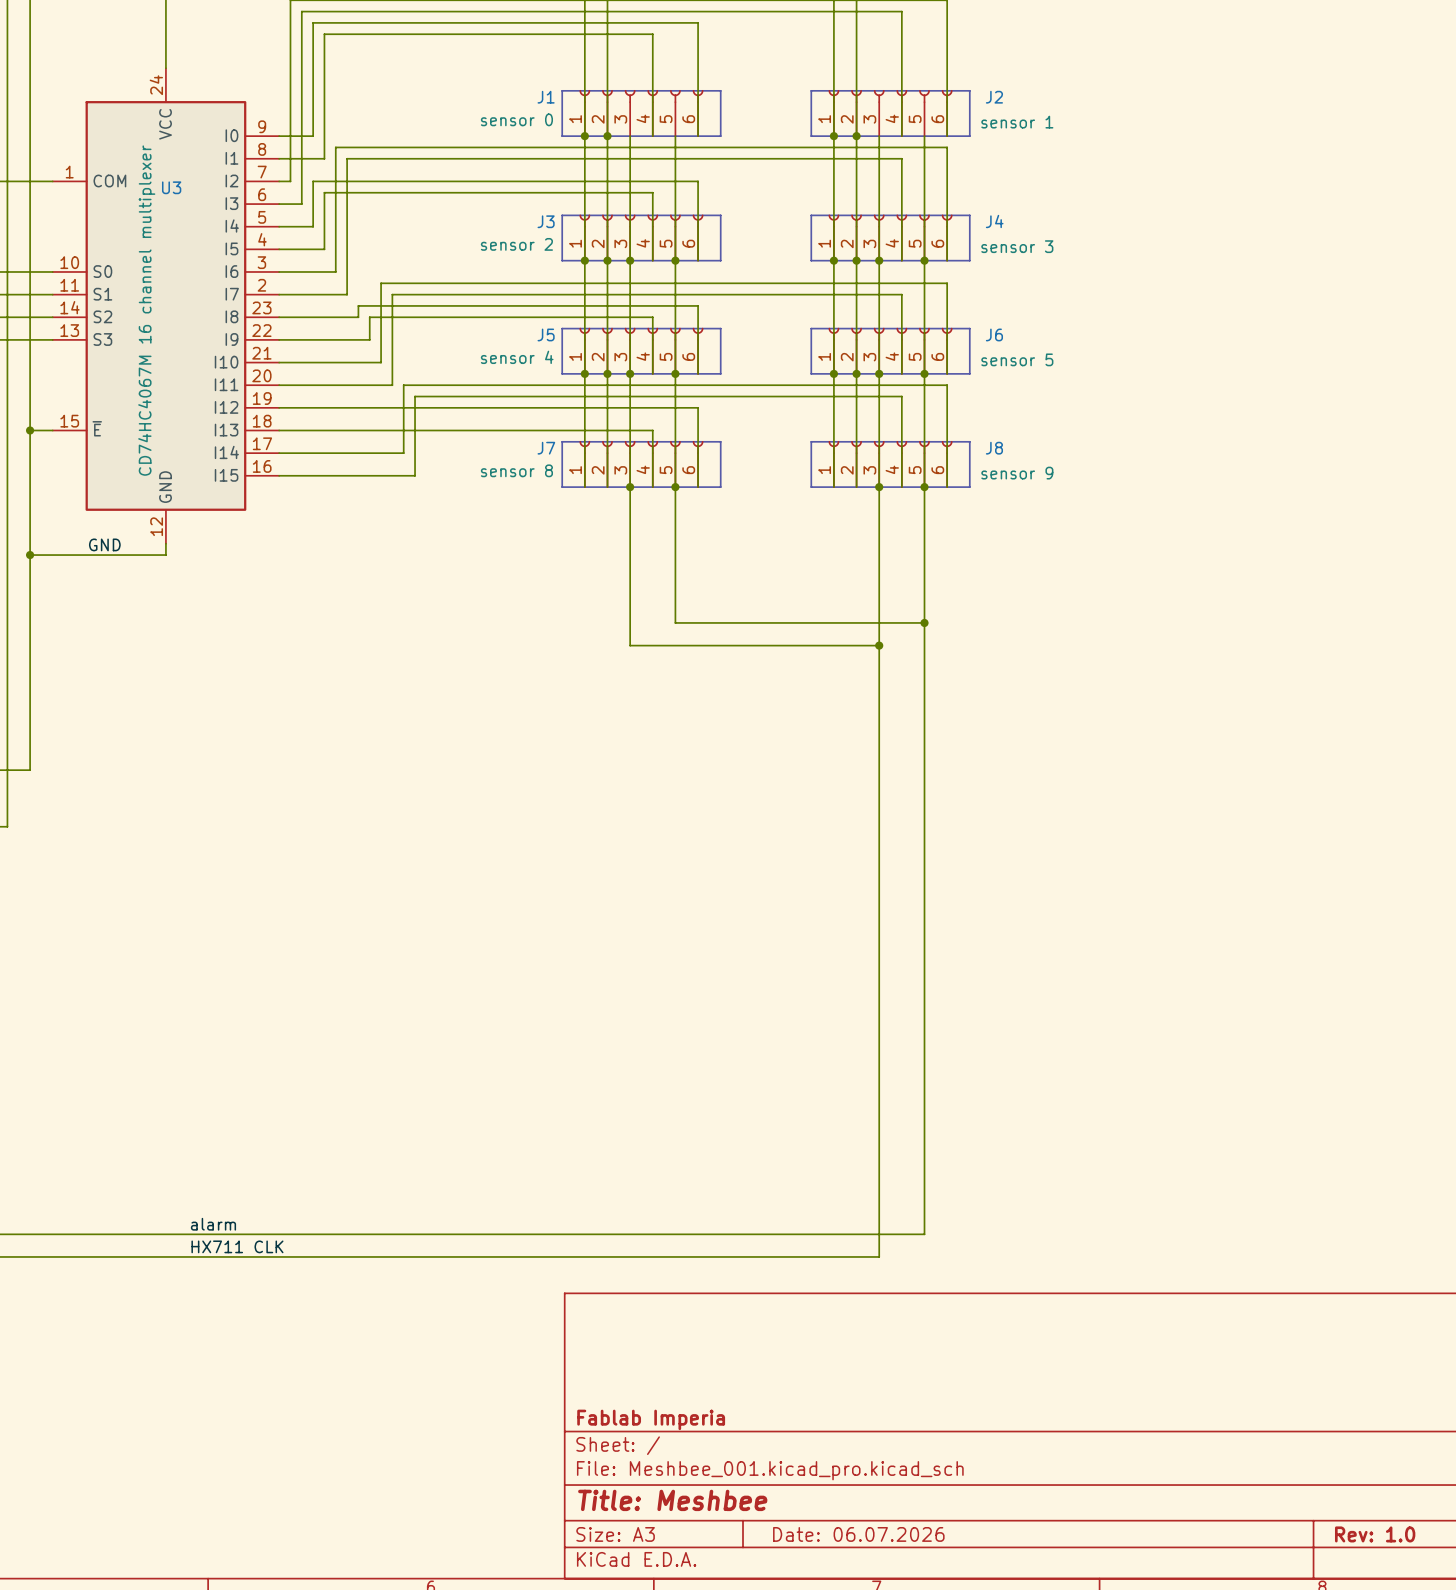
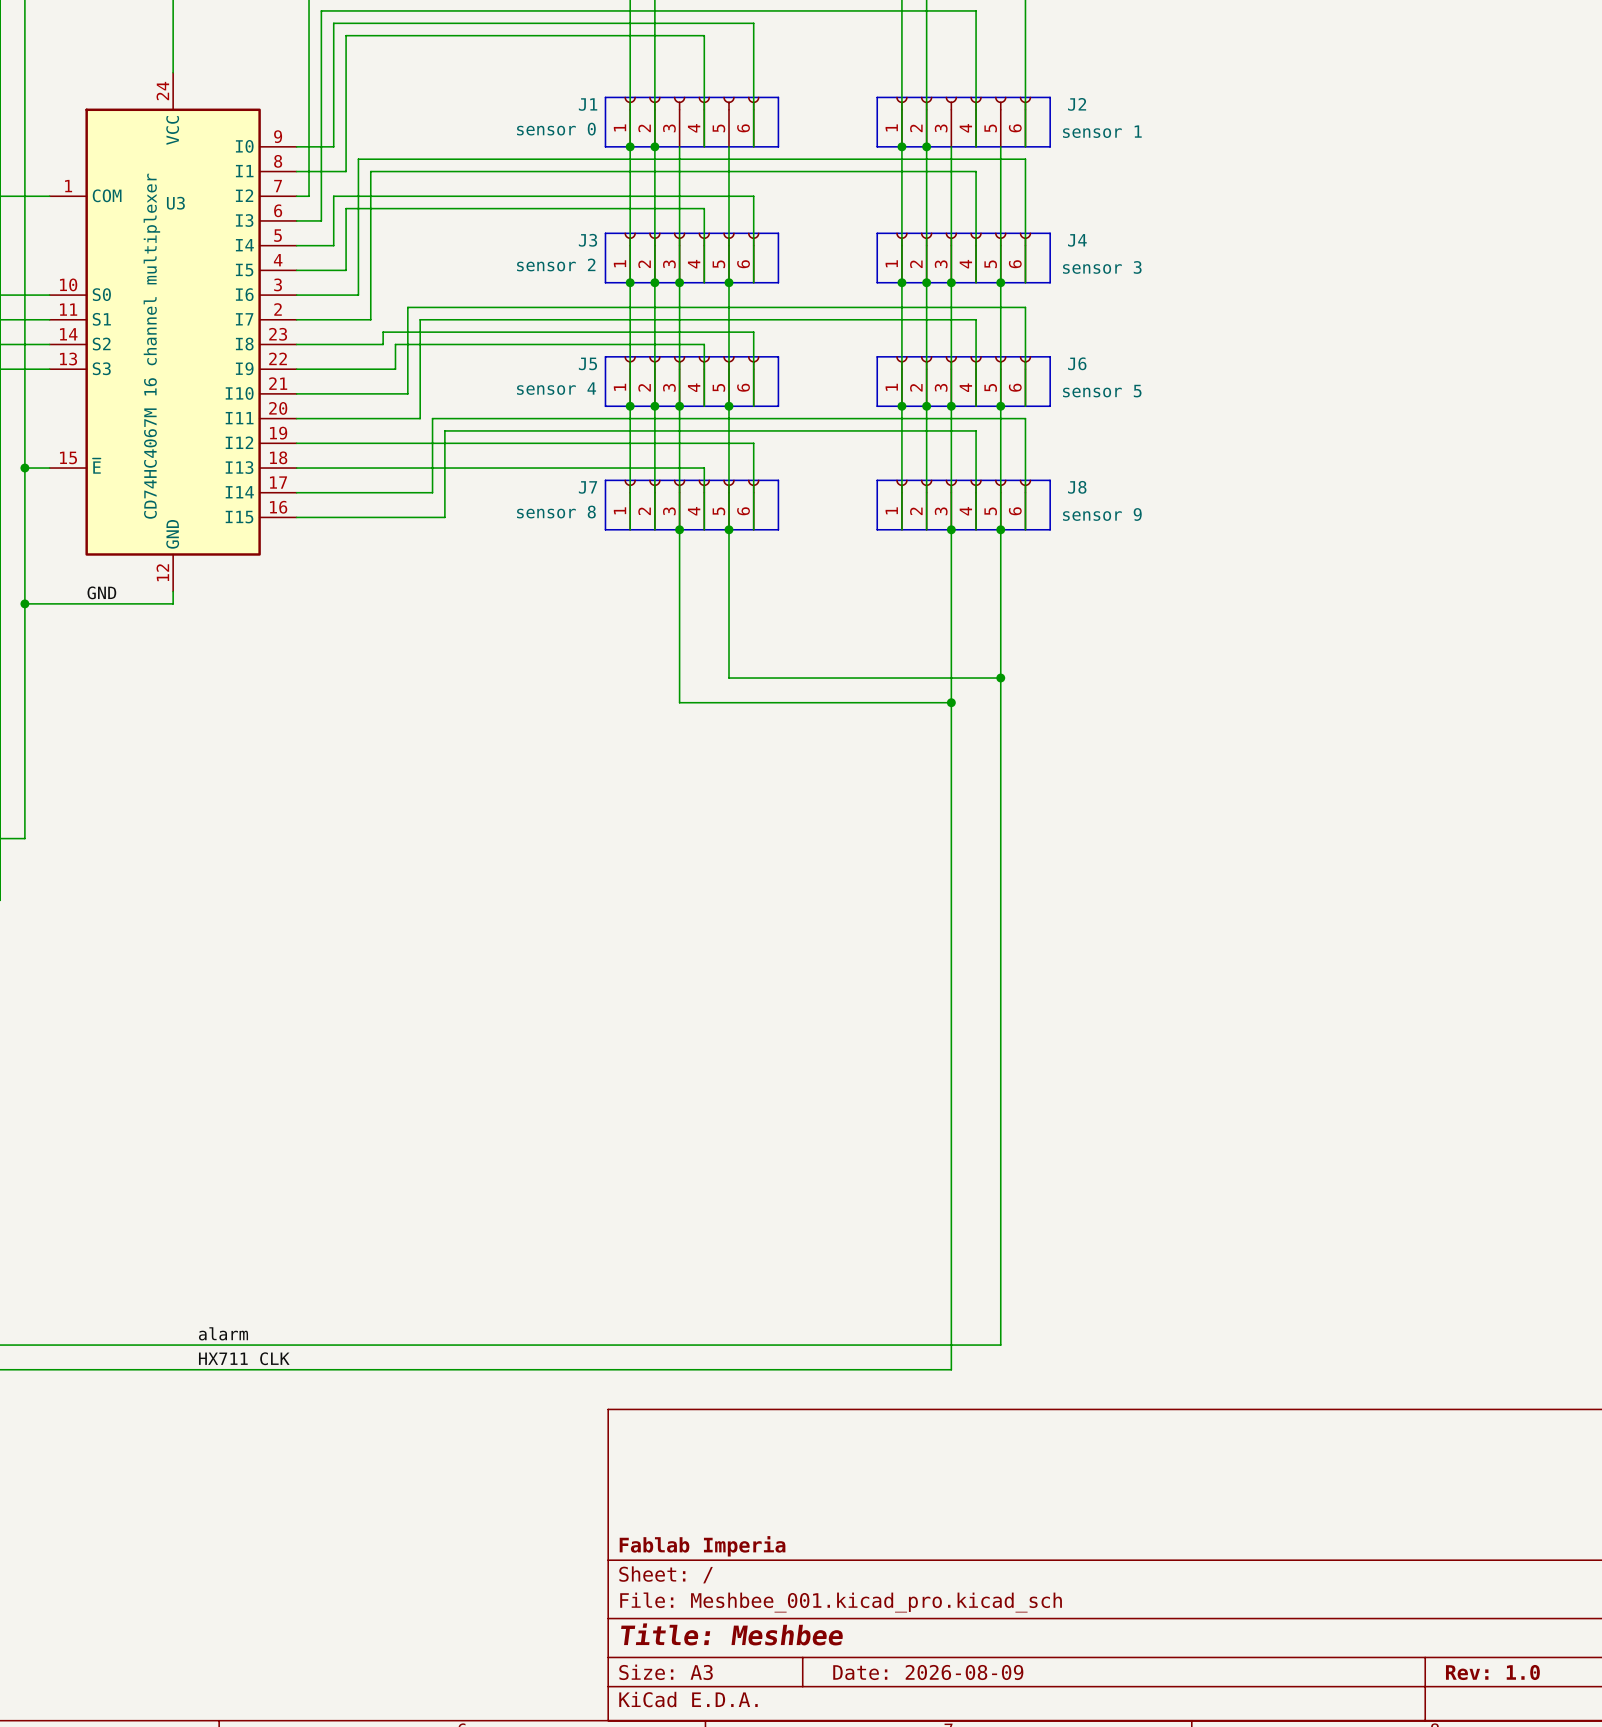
title block: Date: 06.07.2026 (858, 1534) -> Date: 2026-08-09 (928, 1672)

